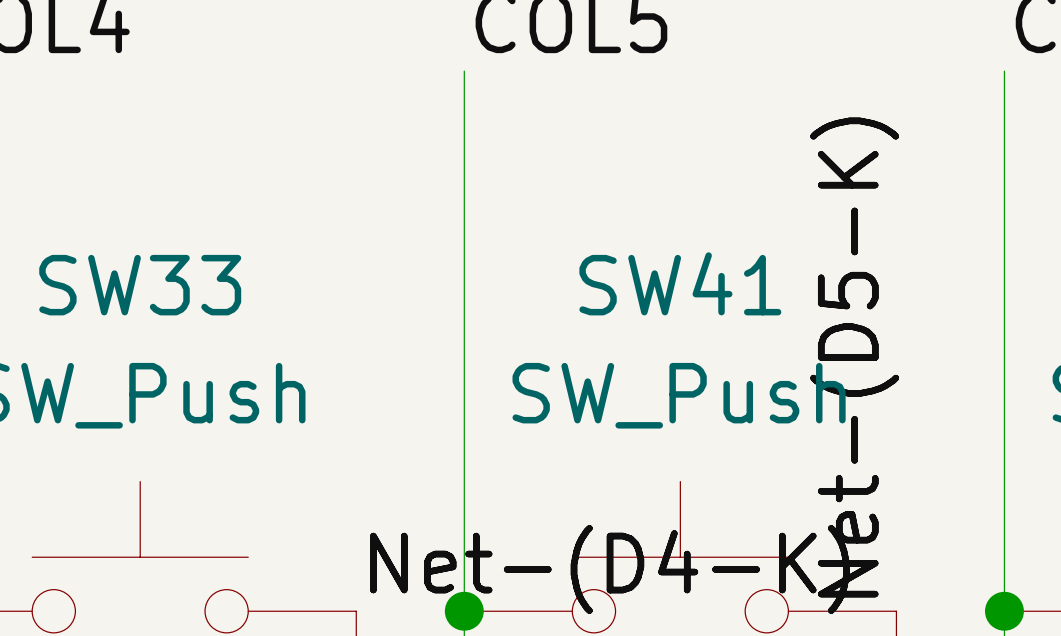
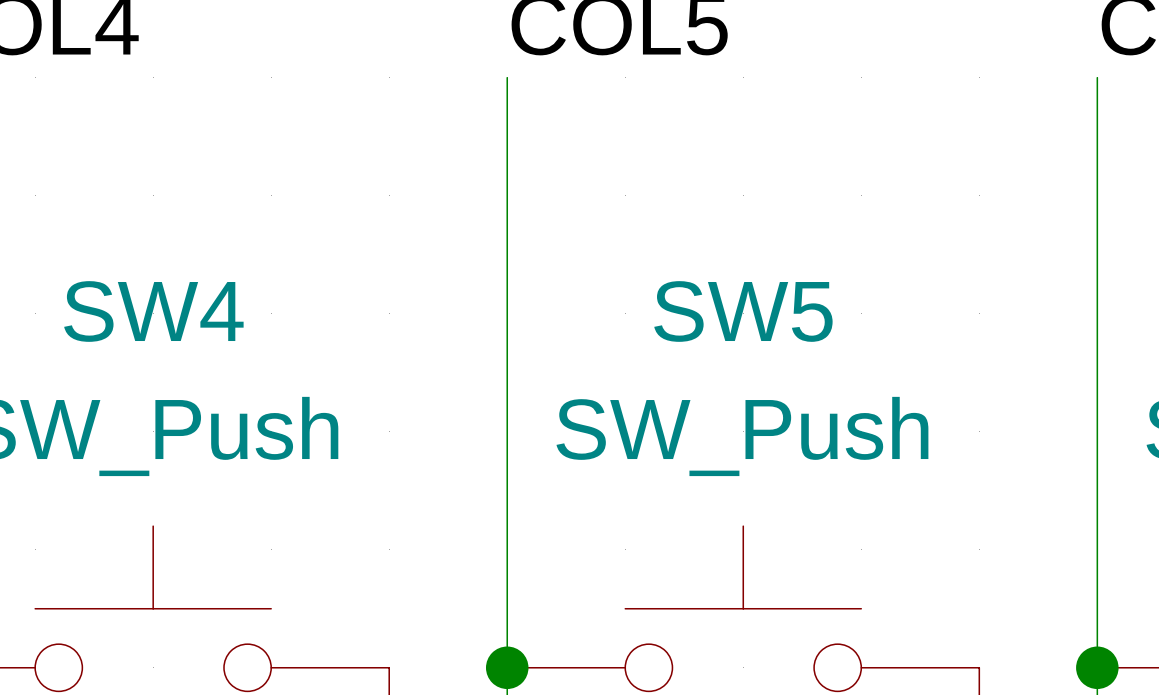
SW41 name: SW41 (680, 283) -> SW5 (743, 311)
SW33 name: SW33 (140, 285) -> SW4 (153, 311)
label: Net-(D5-K) (854, 357) -> none
label: Net-(D4-K) (610, 569) -> none

